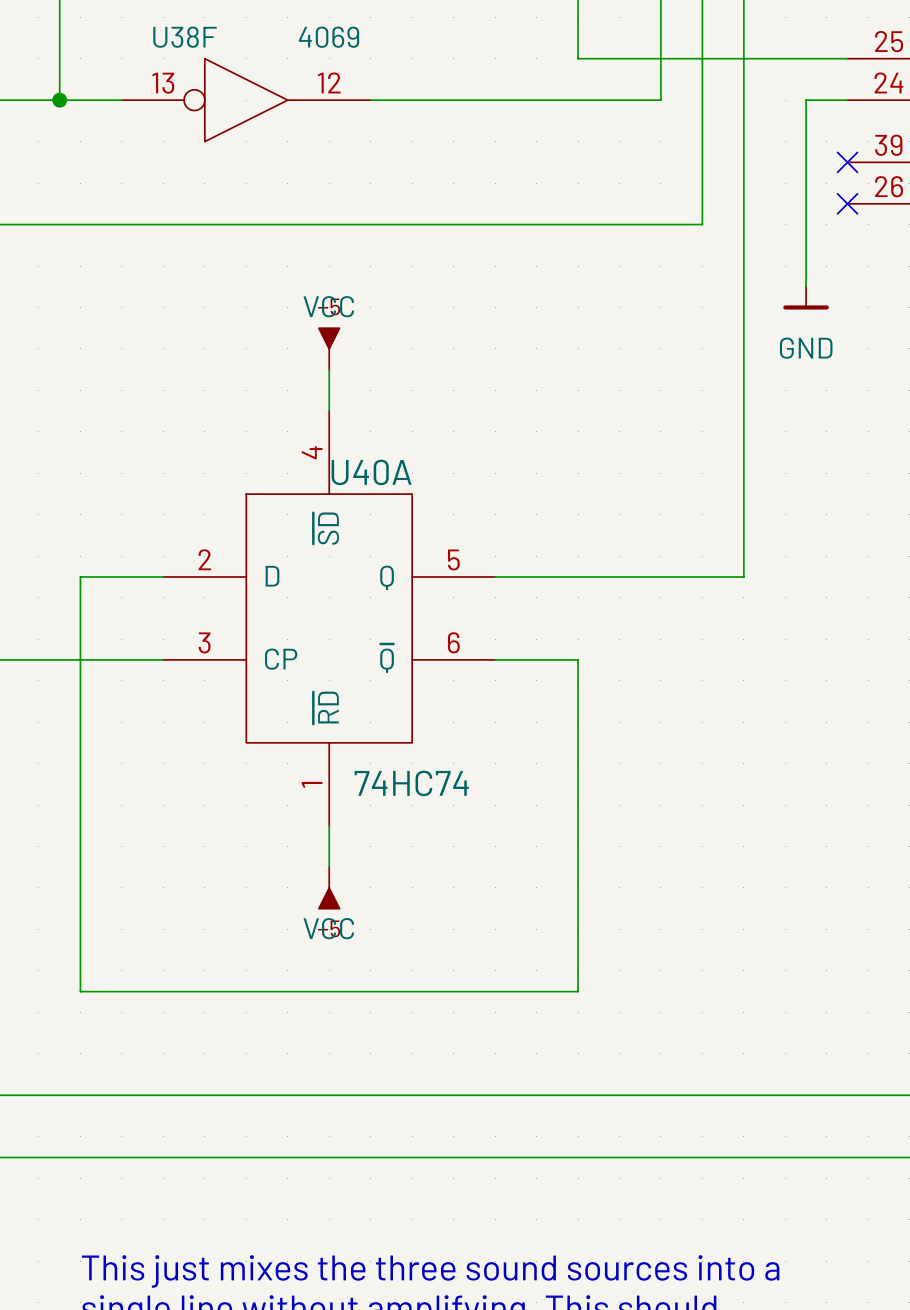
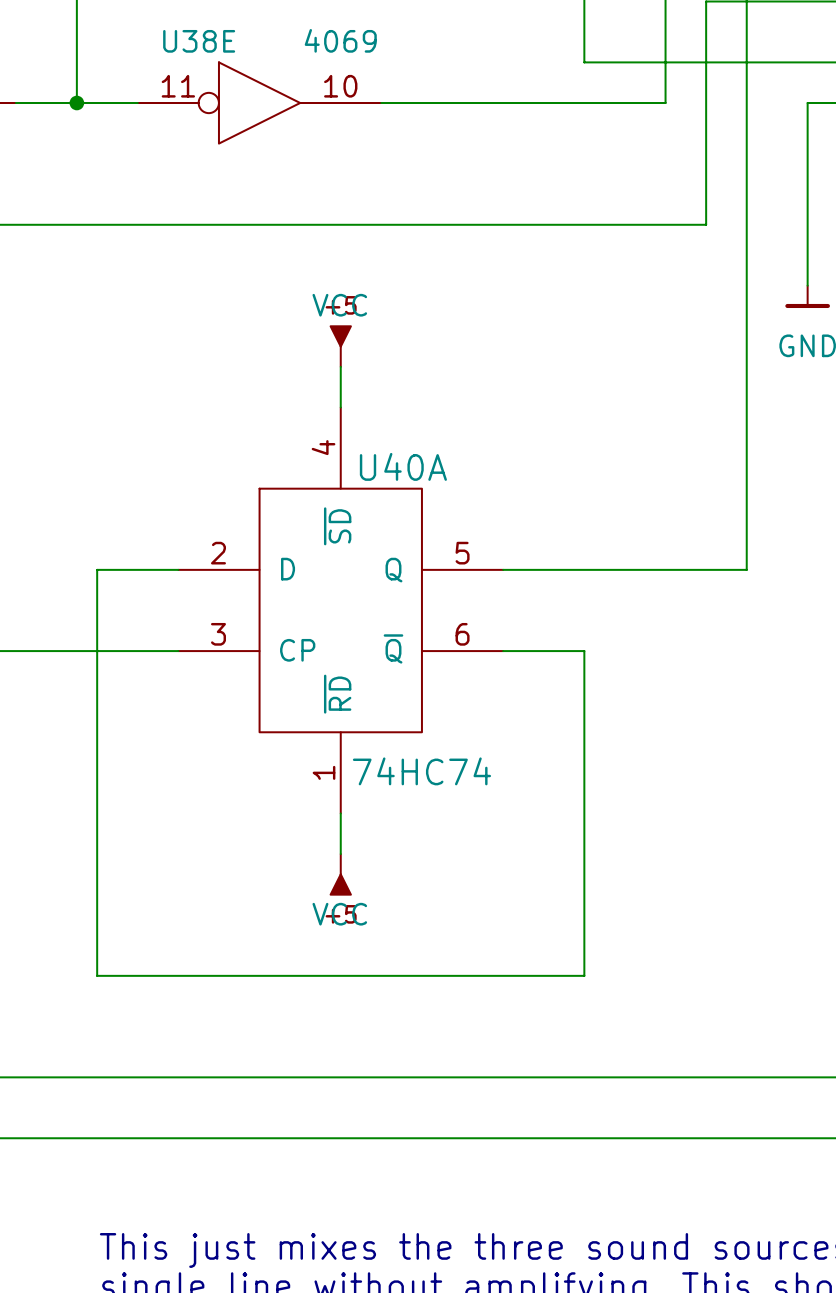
U38F name: U38F (185, 37) -> U38E (199, 41)
U38F pin number: 12 (329, 82) -> 10 (340, 86)
U38F pin number: 13 (163, 83) -> 11 (178, 86)
U40A name position: U40A (371, 472) -> U40A (403, 466)

